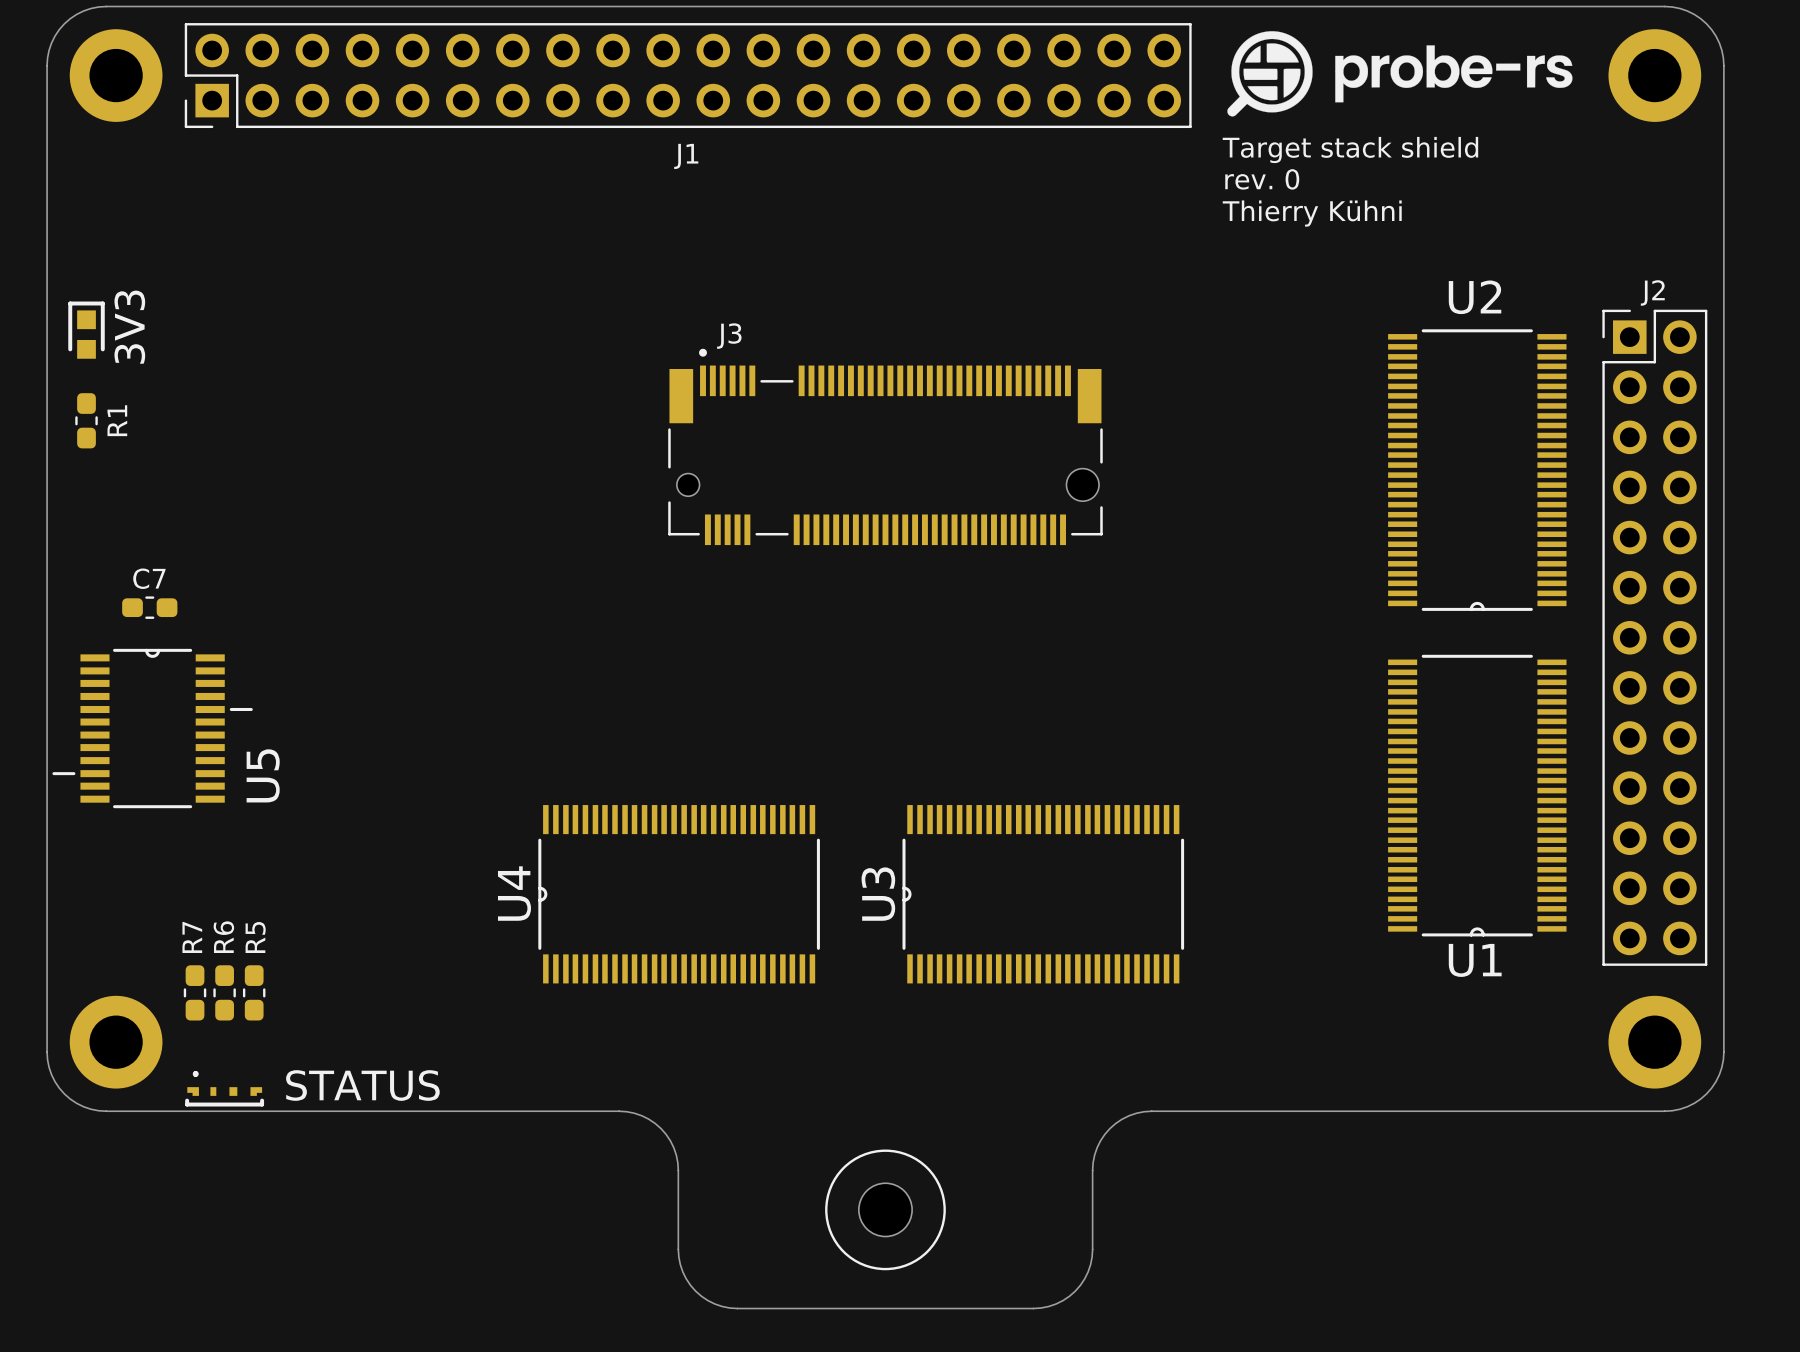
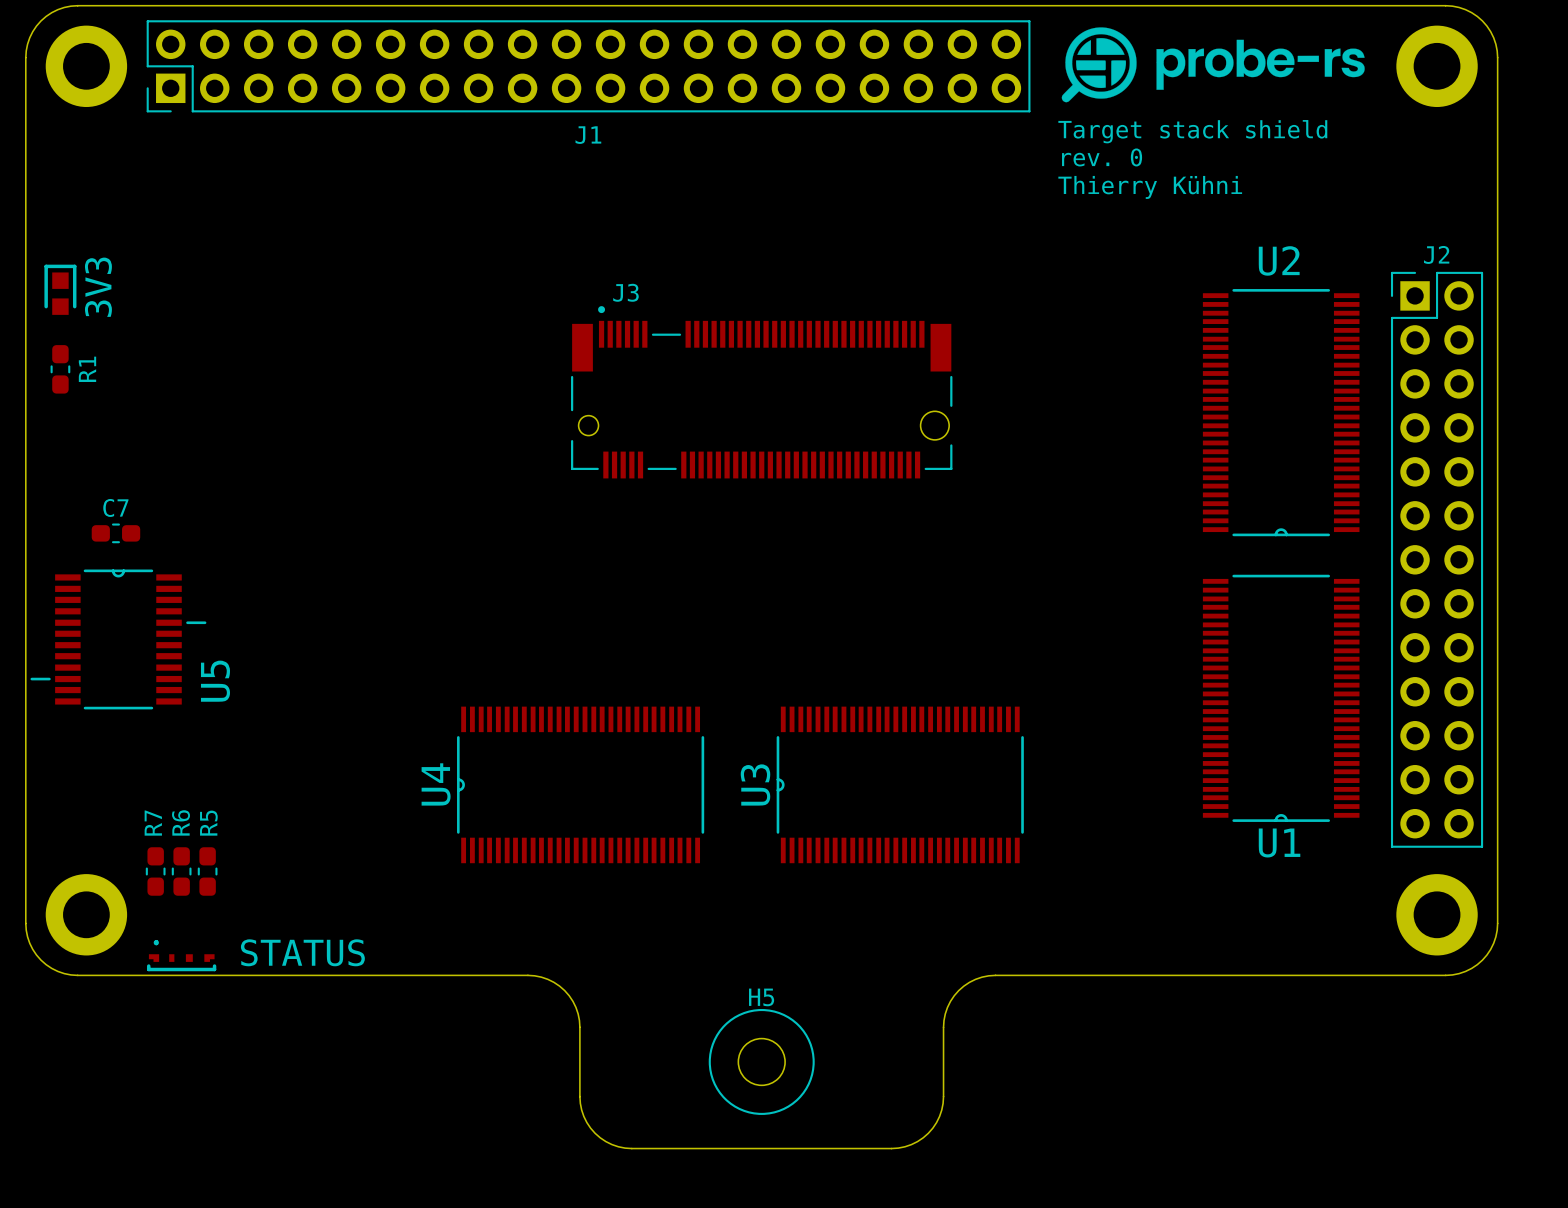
H5 name: none -> H5 (761, 997)

